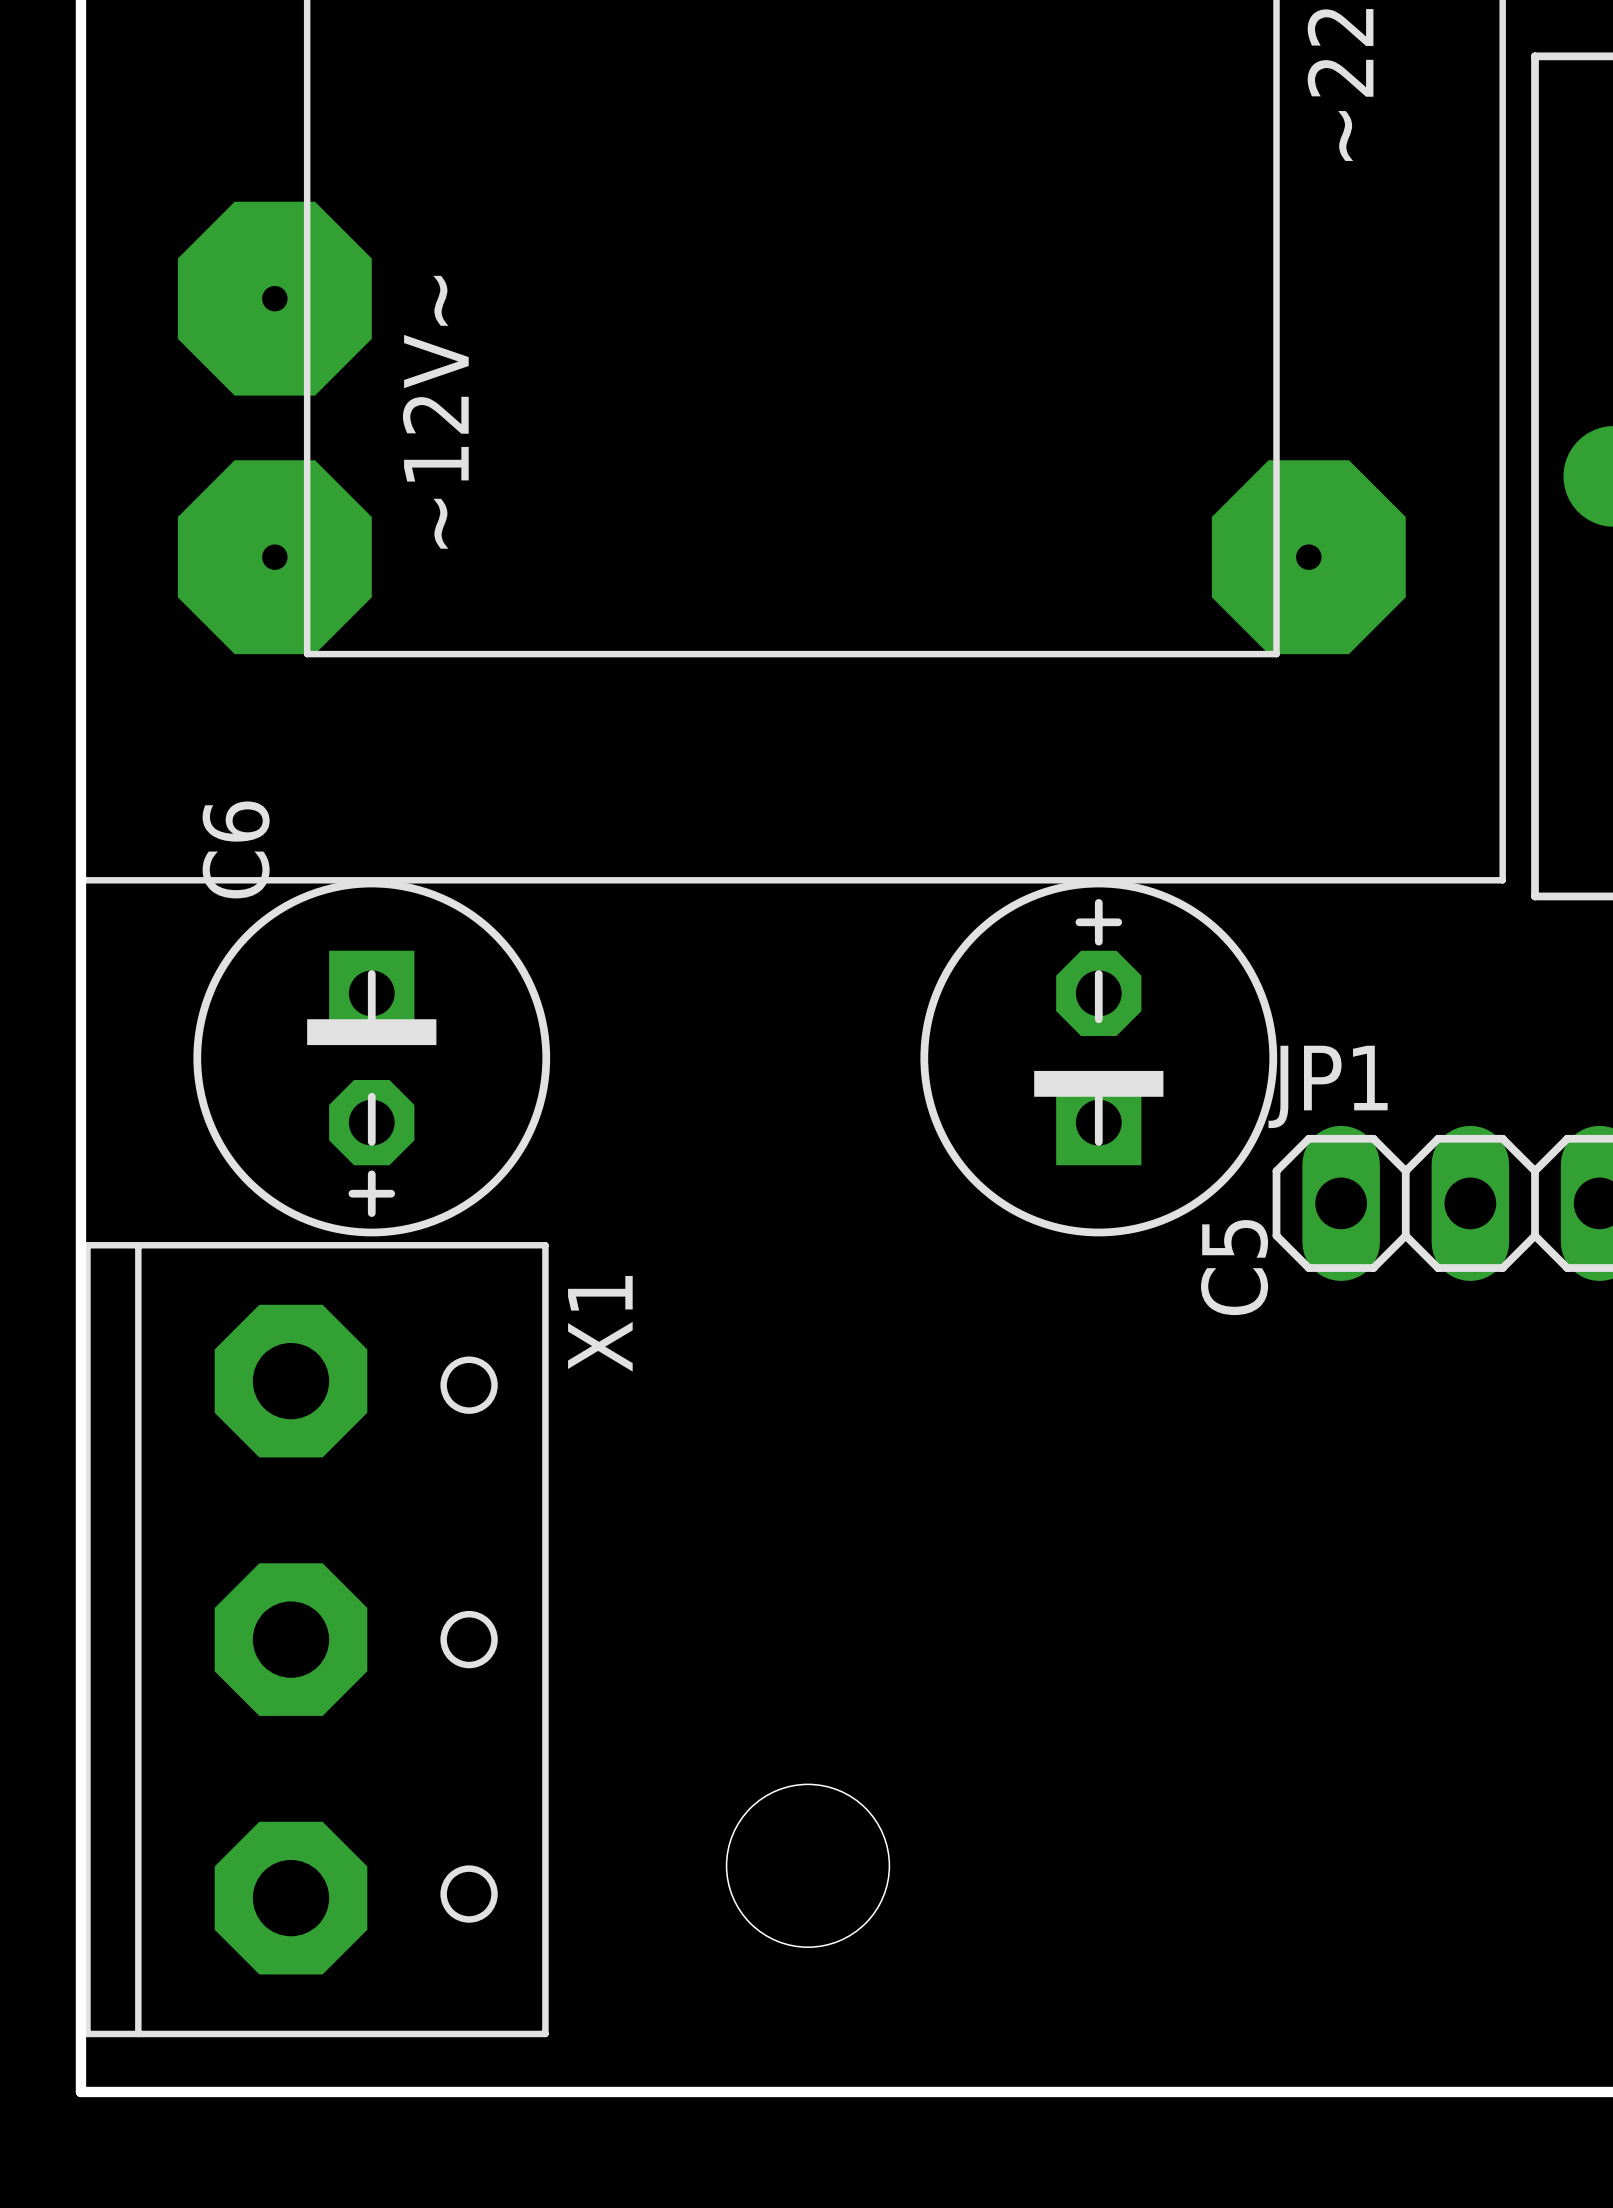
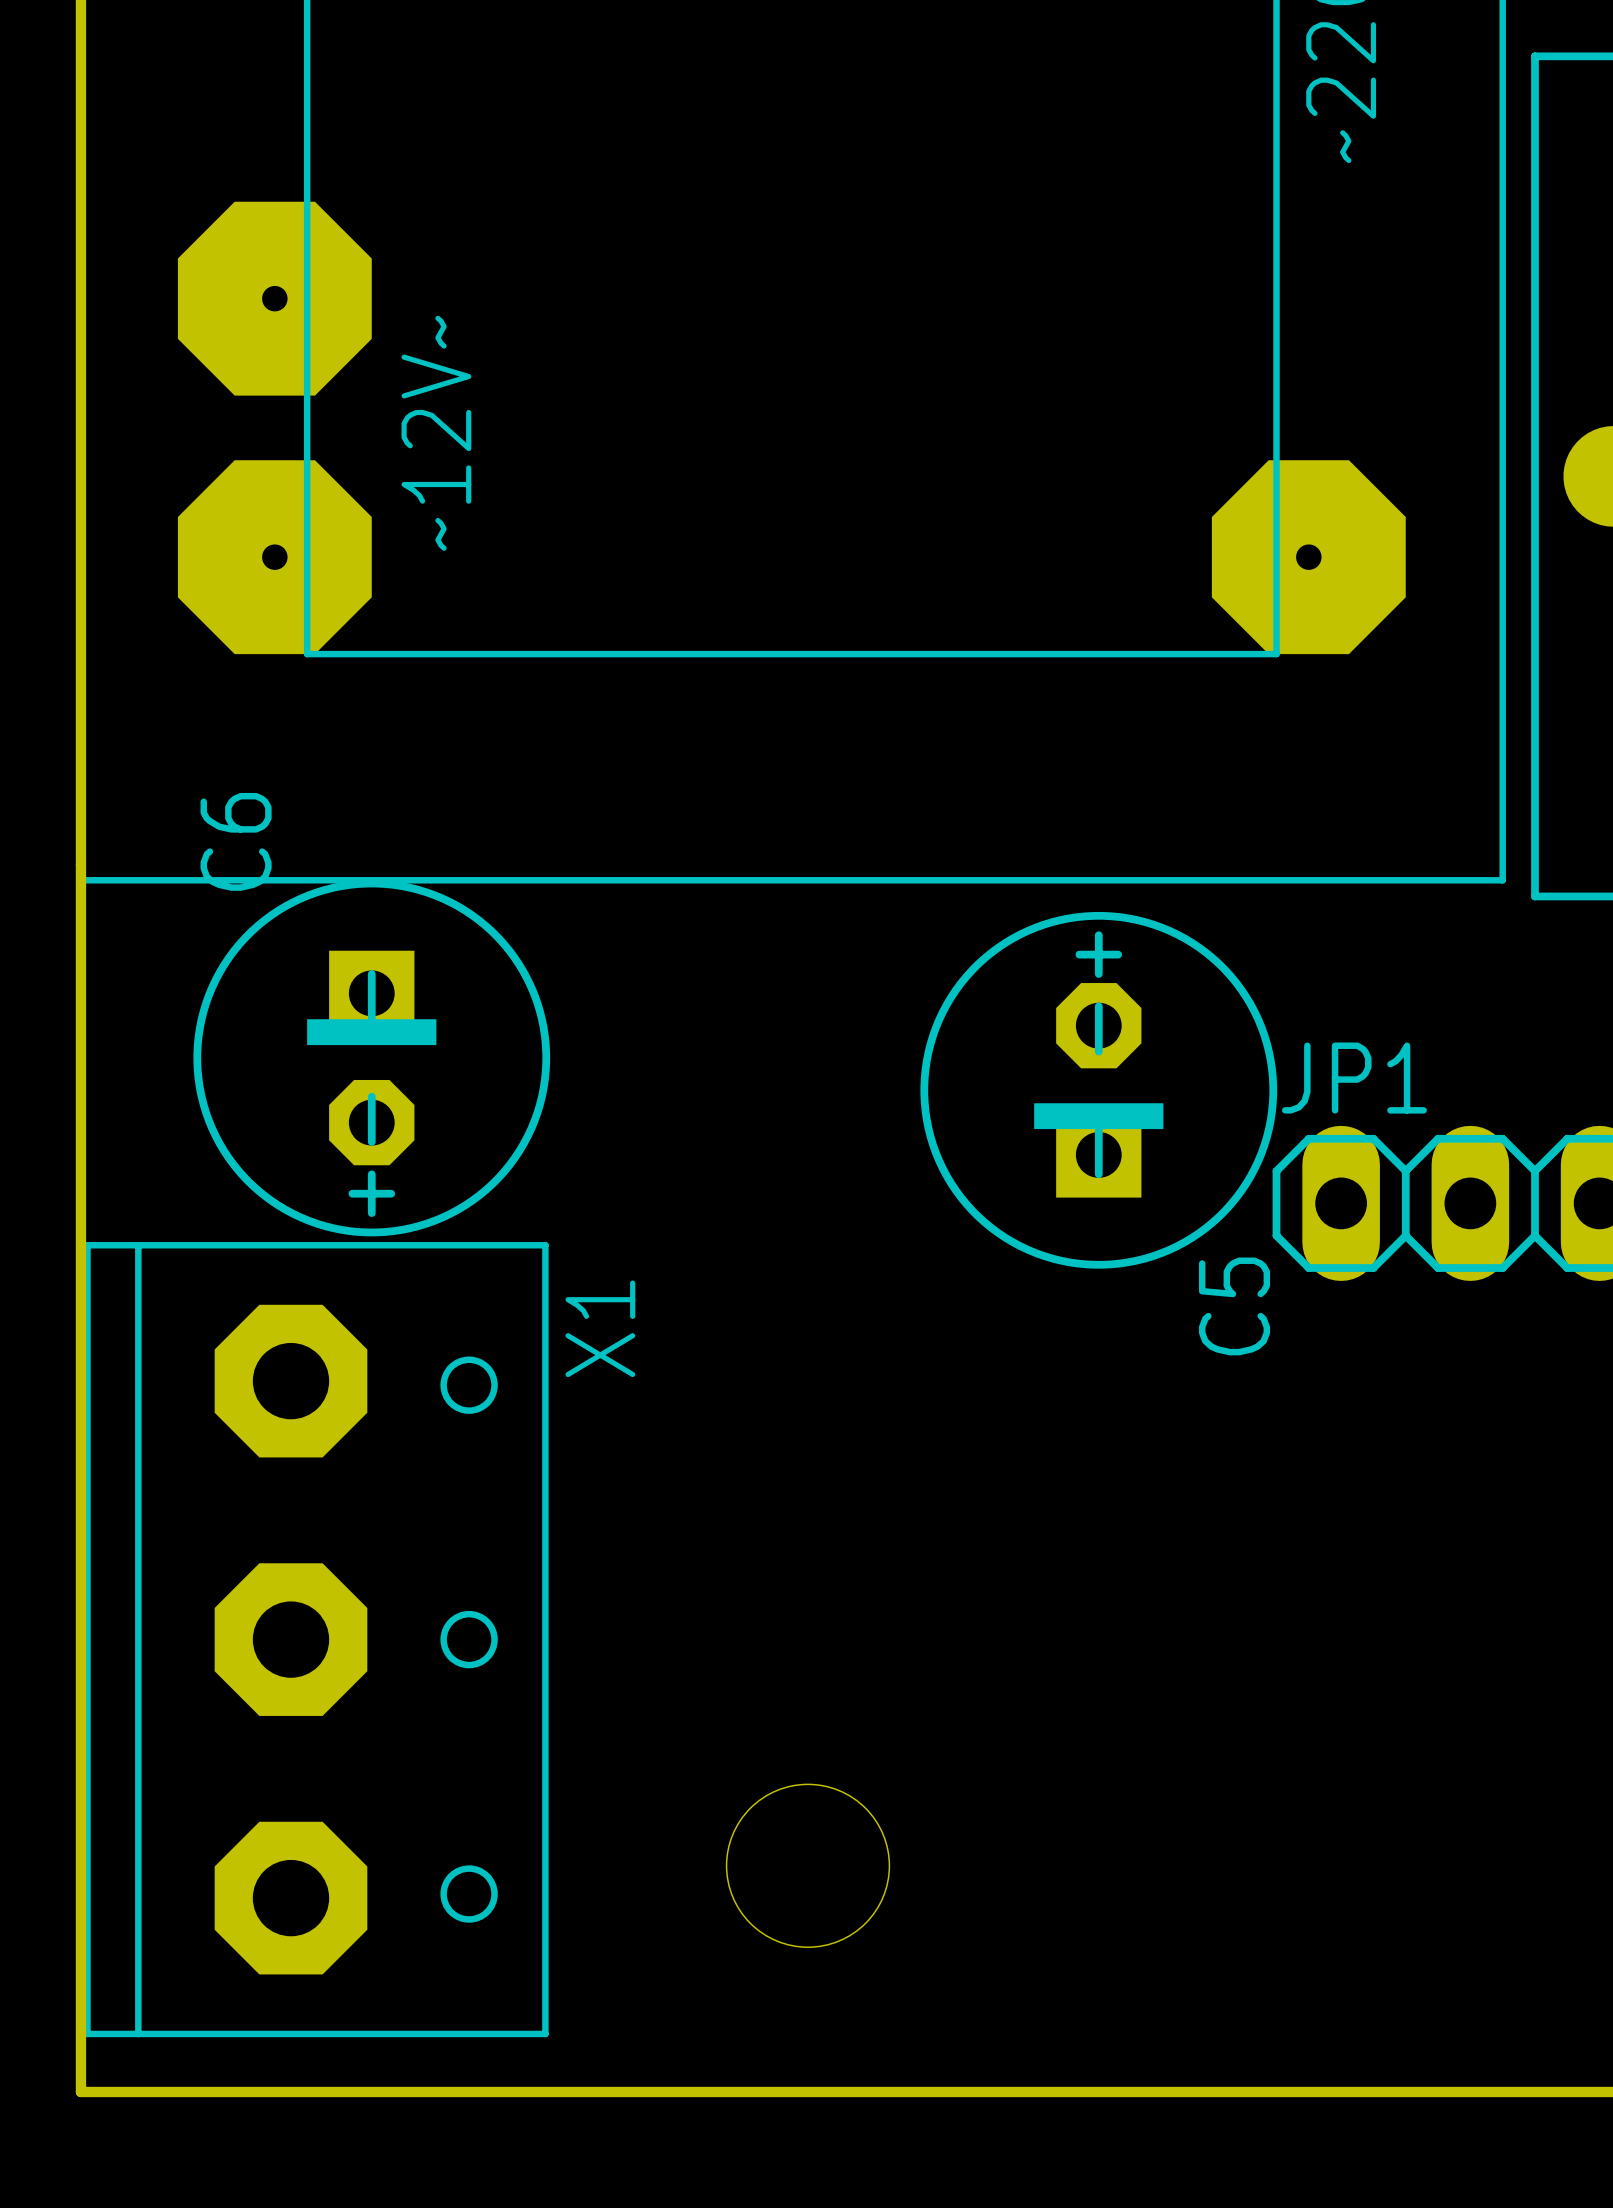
C5 position: (1098, 1058) -> (1098, 1090)

